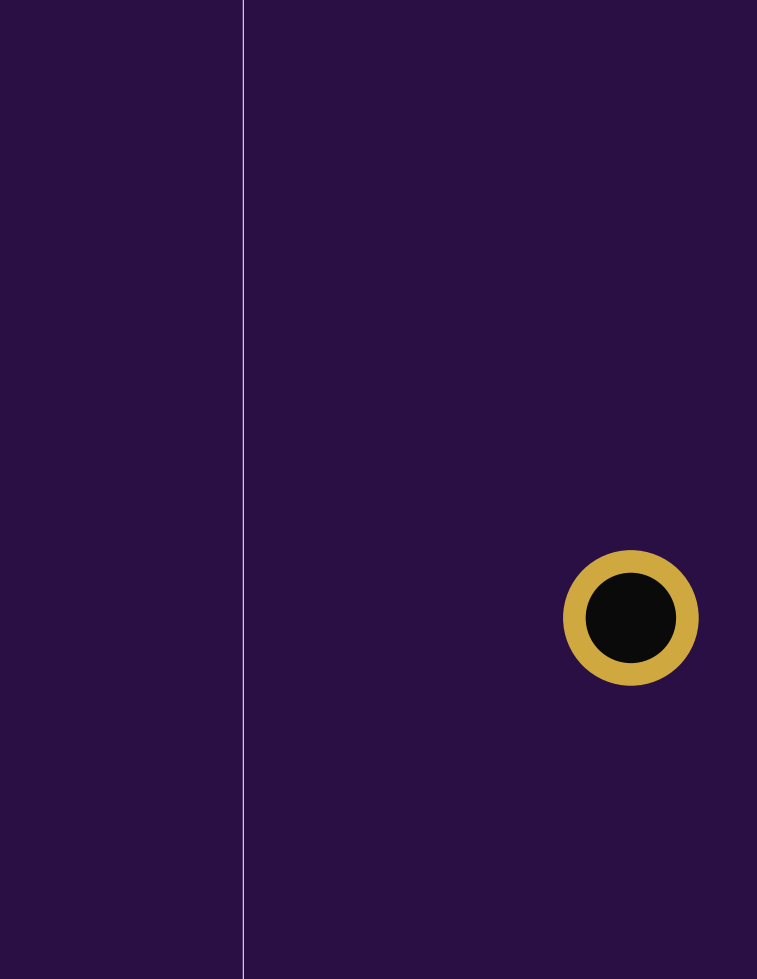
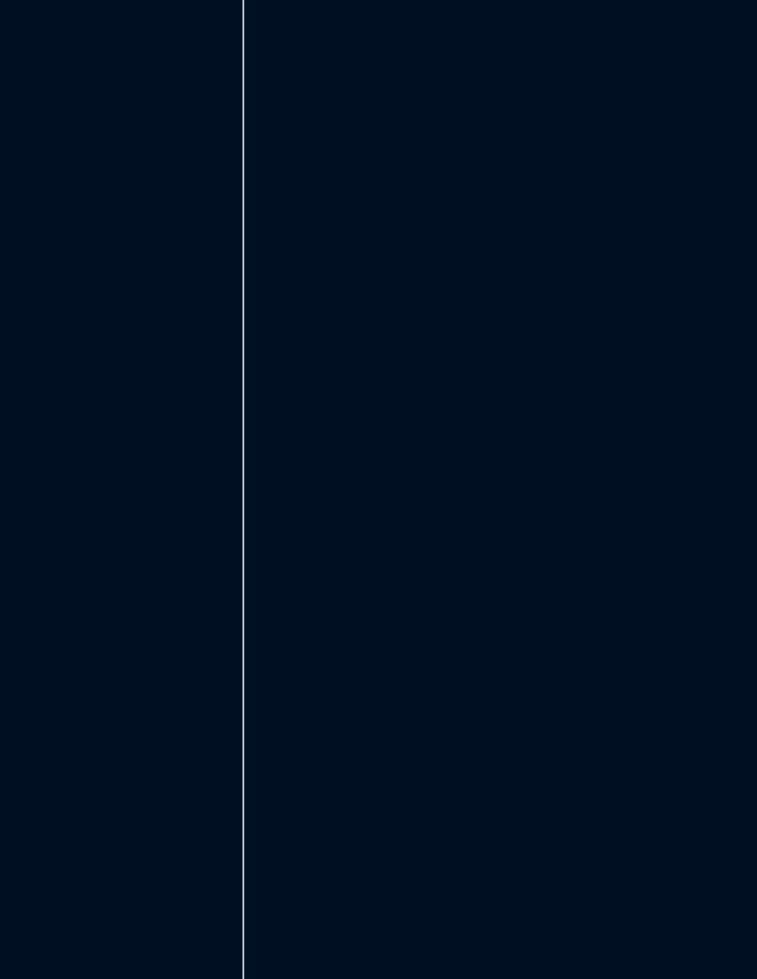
via: (630, 617) -> none

